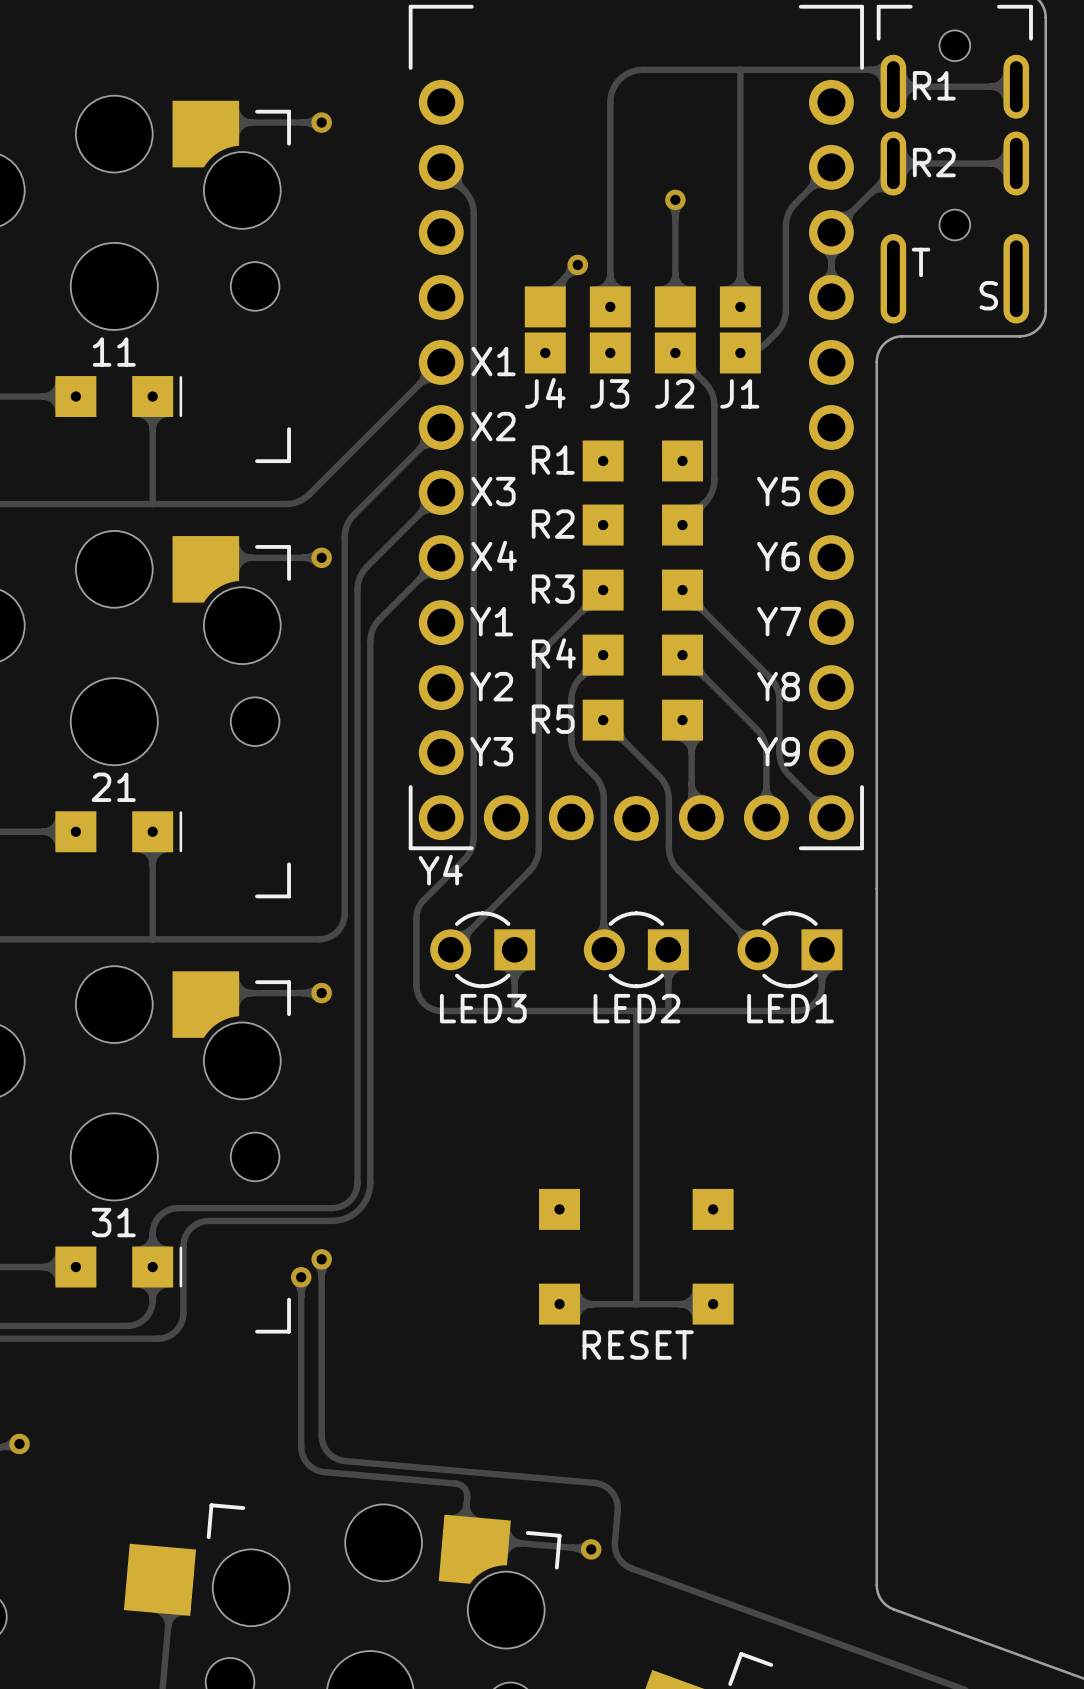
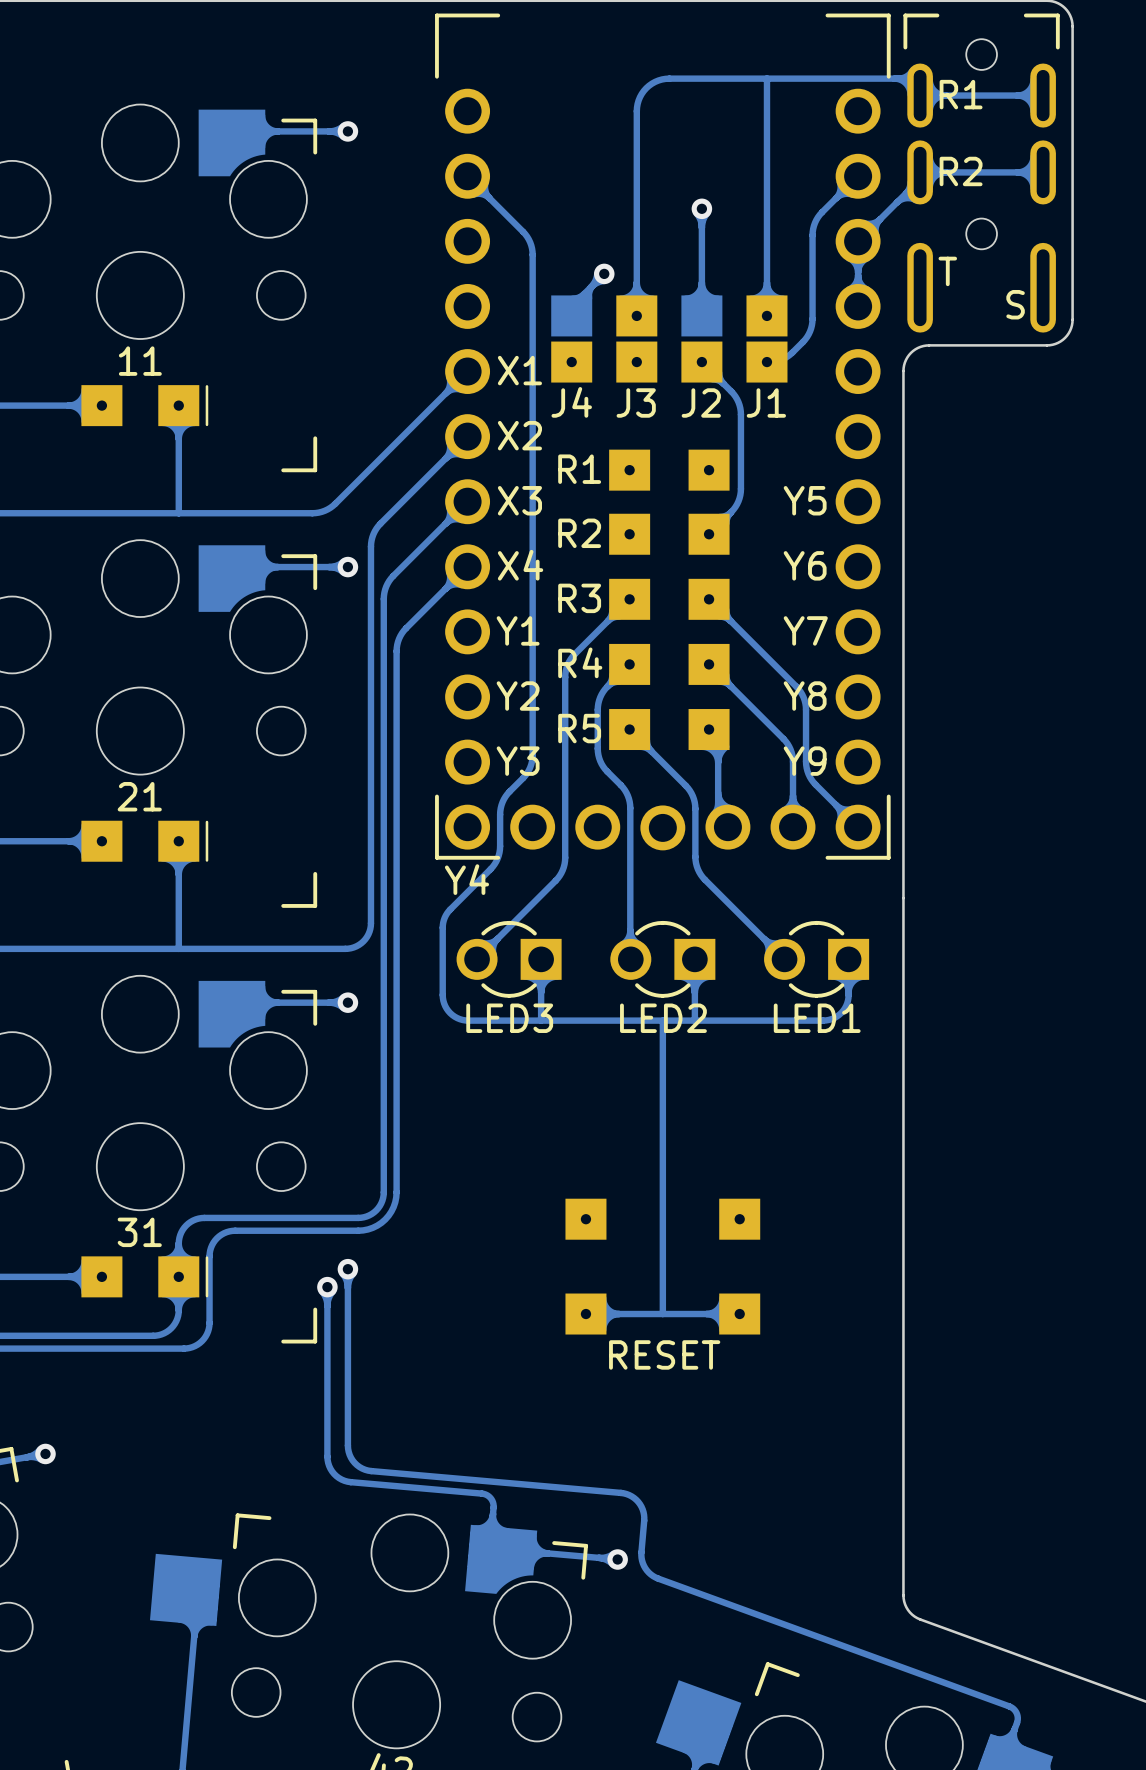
track: (464, 190) (471, 200) (473, 213) (473, 805) -> (490, 199) (525, 234) (531, 245) (532, 254) (532, 758) (527, 773) (503, 799) (500, 814)

